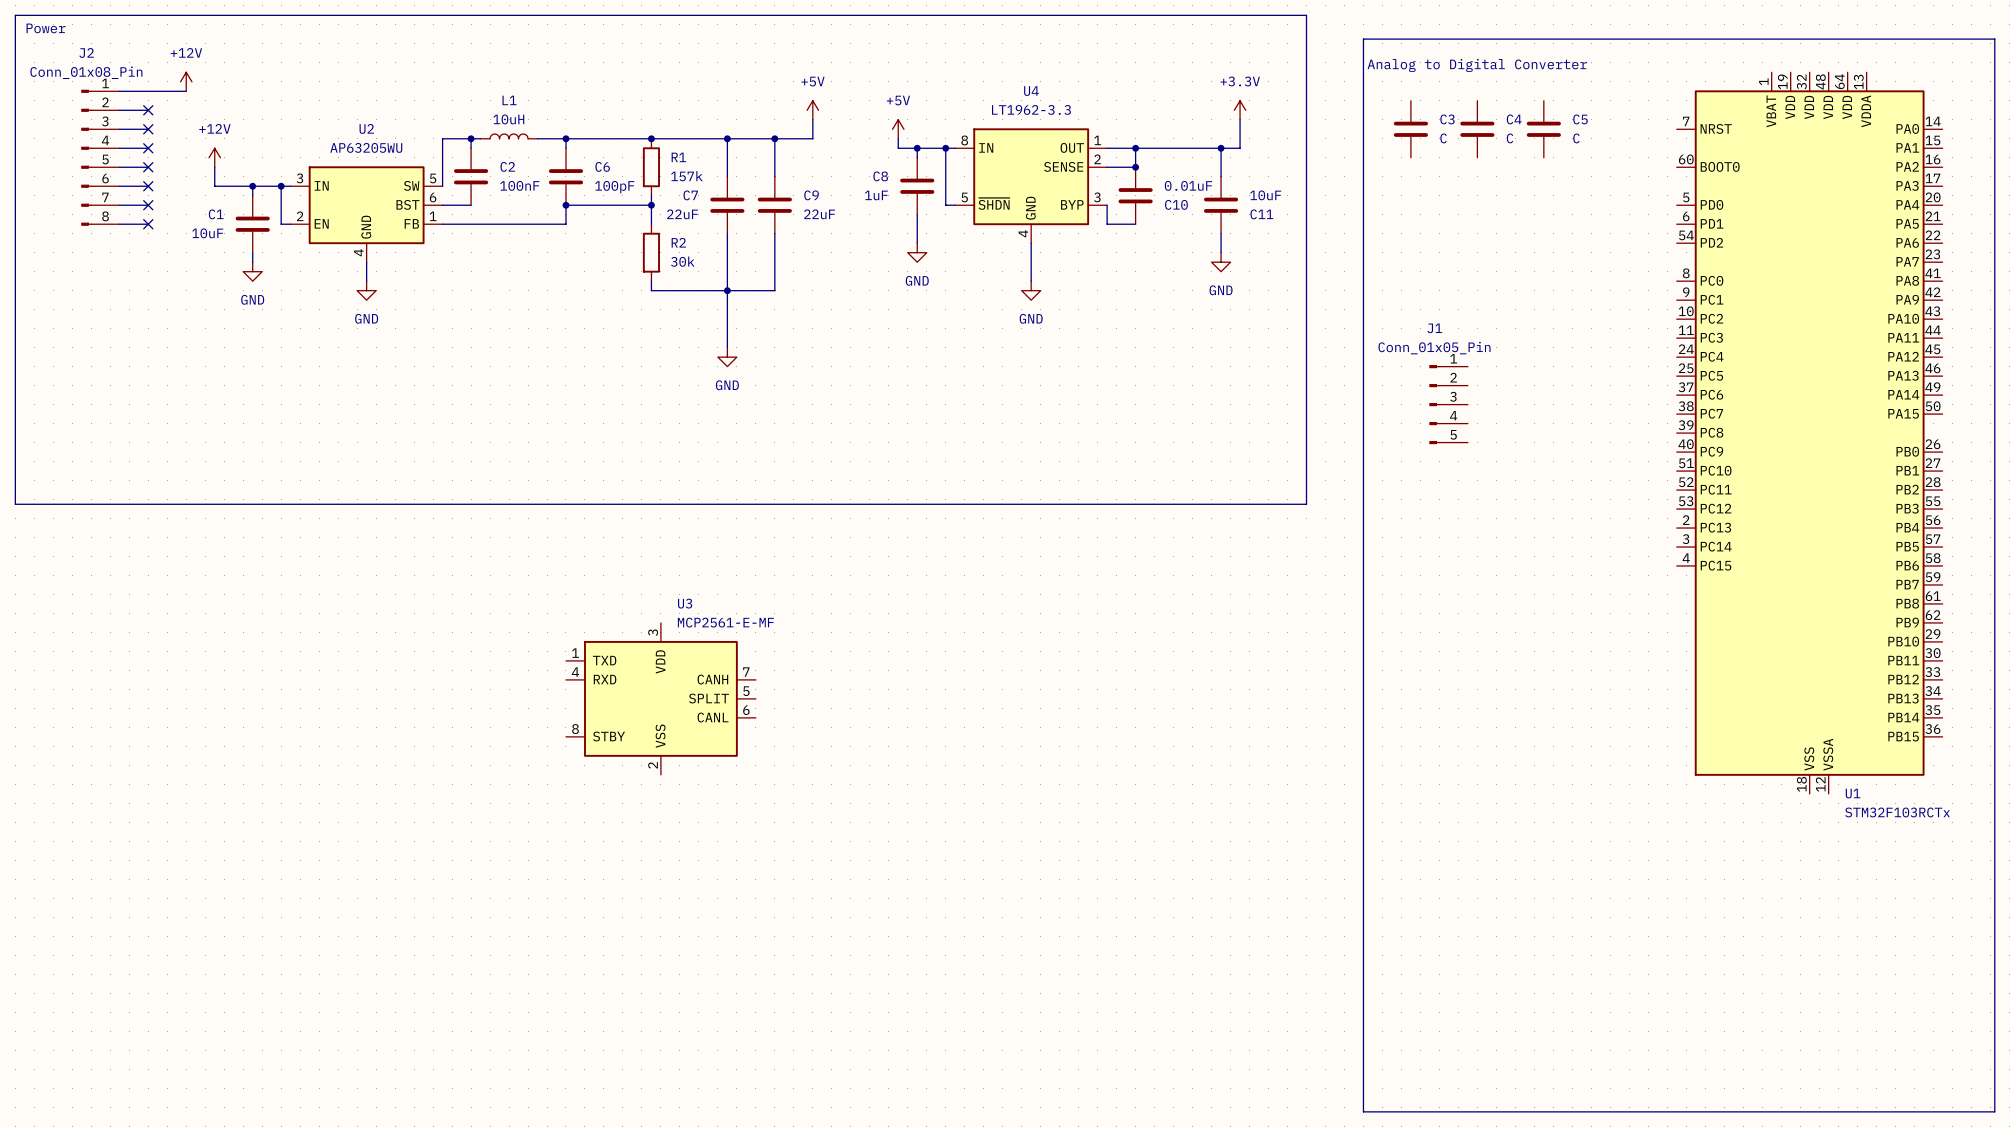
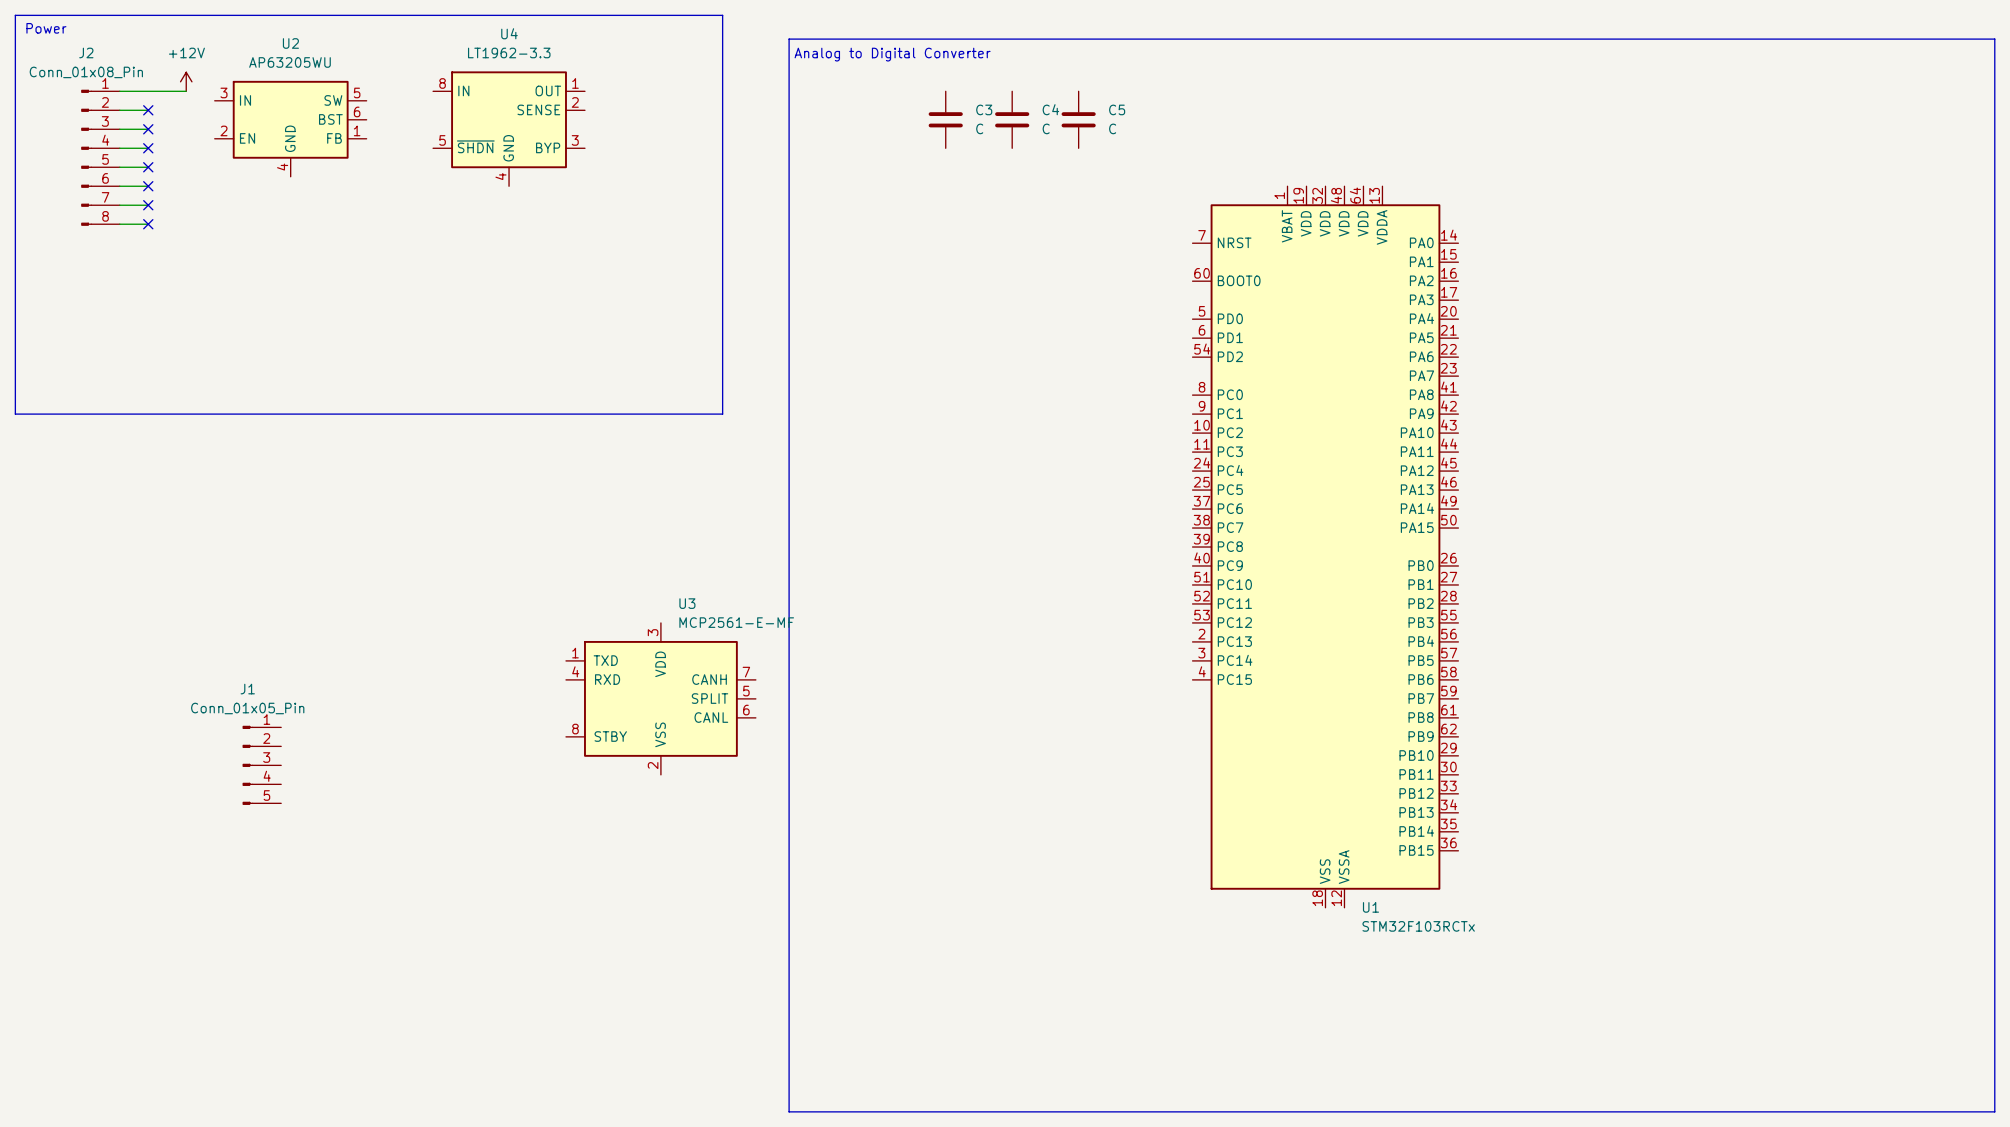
line: (722, 15) (1306, 15) (1306, 504) (15, 504) (15, 414) -> (722, 15) (722, 414) (15, 414)
line: (1363, 39) (1363, 1111) -> (1363, 39) (789, 39) (789, 1111) (1363, 1111)
text: none -> Analog to Digital Converter (892, 54)
text: Analog to Digital Converter (1477, 65) -> none
power symbol: +5V (812, 110) -> none
power symbol: +3.3V (1240, 110) -> none
wire: (812, 119) (812, 138) (537, 138) -> none
wire: (1240, 119) (1240, 148) (1107, 148) -> none
power symbol: +5V (898, 129) -> none
C3 position: (1410, 129) -> (945, 119)
C4 position: (1477, 129) -> (1012, 119)
C5 position: (1543, 129) -> (1078, 119)
L1: 10uH (509, 136) -> none
junction: (471, 138) -> none
wire: (480, 138) (442, 138) (442, 186) -> none
junction: (565, 138) -> none
junction: (651, 138) -> none
wire: (727, 138) (727, 176) -> none
junction: (727, 138) -> none
wire: (774, 138) (774, 176) -> none
junction: (774, 138) -> none
wire: (898, 138) (898, 148) (955, 148) -> none
wire: (917, 148) (917, 157) -> none
junction: (917, 148) -> none
wire: (945, 148) (945, 205) (955, 205) -> none
junction: (945, 148) -> none
wire: (1135, 148) (1135, 167) (1107, 167) -> none
junction: (1135, 148) -> none
wire: (1221, 148) (1221, 176) -> none
junction: (1221, 148) -> none
power symbol: +12V (214, 157) -> none
wire: (214, 167) (214, 186) (290, 186) -> none
R1: 157k (651, 167) -> none
junction: (1135, 167) -> none
C2: 100nF (471, 176) -> none
C6: 100pF (565, 176) -> none
U4 position: (1031, 185) -> (509, 128)
wire: (252, 186) (252, 195) -> none
junction: (252, 186) -> none
wire: (281, 186) (281, 224) (290, 224) -> none
junction: (281, 186) -> none
C8: 1uF (917, 186) -> none
wire: (651, 195) (651, 224) -> none
C10: 0.01uF (1135, 195) -> none
wire: (442, 205) (471, 205) -> none
junction: (565, 205) -> none
wire: (651, 205) (565, 205) (565, 224) (442, 224) -> none
junction: (651, 205) -> none
C7: 22uF (727, 205) -> none
C9: 22uF (774, 205) -> none
wire: (1107, 205) (1107, 224) (1135, 224) -> none
C11: 10uF (1221, 205) -> none
U2 position: (366, 214) -> (290, 128)
wire: (917, 214) (917, 243) -> none
C1: 10uF (252, 224) -> none
wire: (727, 233) (727, 347) -> none
wire: (774, 233) (774, 290) (651, 290) (651, 281) -> none
wire: (1031, 243) (1031, 281) -> none
wire: (252, 252) (252, 262) -> none
R2: 30k (651, 252) -> none
power symbol: GND (917, 252) -> none
wire: (366, 262) (366, 281) -> none
power symbol: GND (1221, 262) -> none
power symbol: GND (252, 271) -> none
power symbol: GND (366, 290) -> none
junction: (727, 290) -> none
power symbol: GND (1031, 290) -> none
power symbol: GND (727, 357) -> none
J1 position: (1448, 404) -> (261, 765)
U1 position: (1809, 433) -> (1325, 547)

